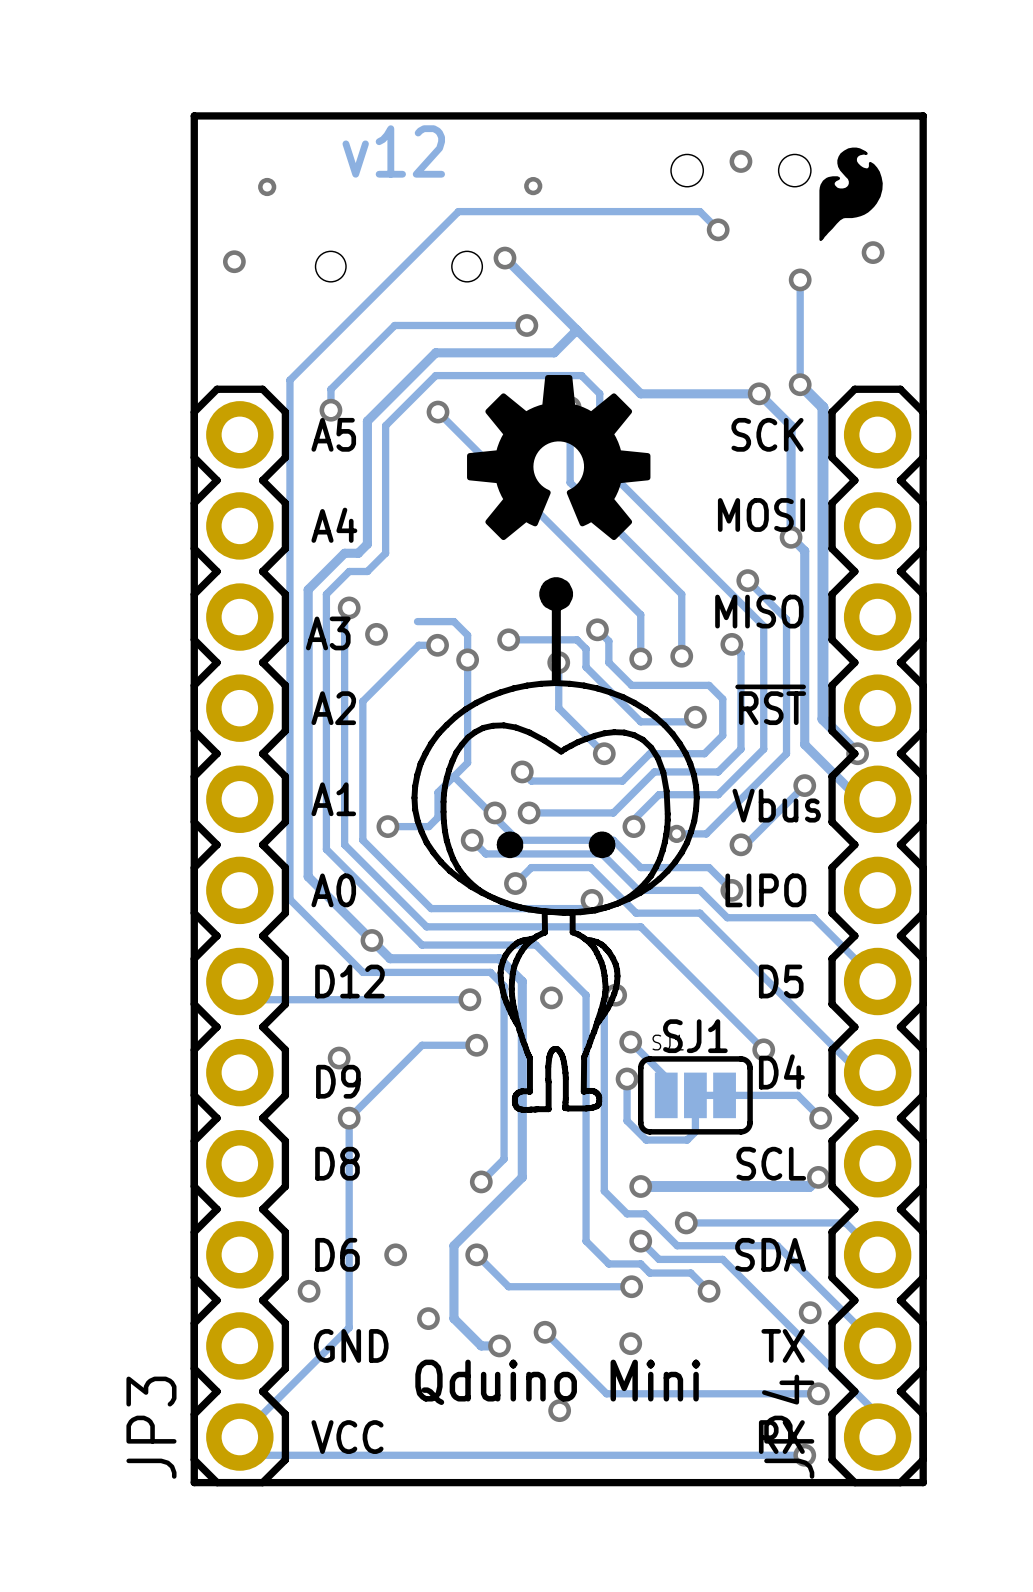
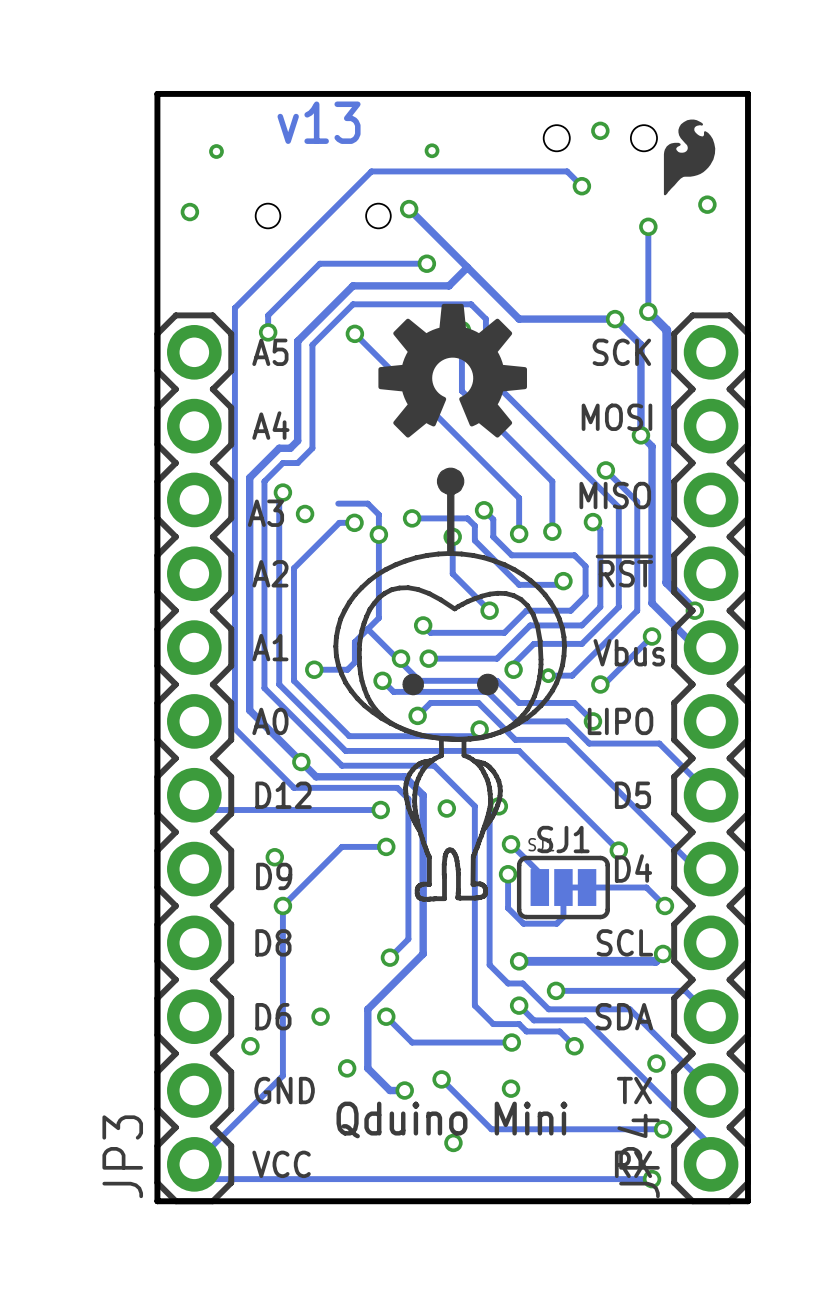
text: v12 (393, 151) -> v13 (319, 122)

